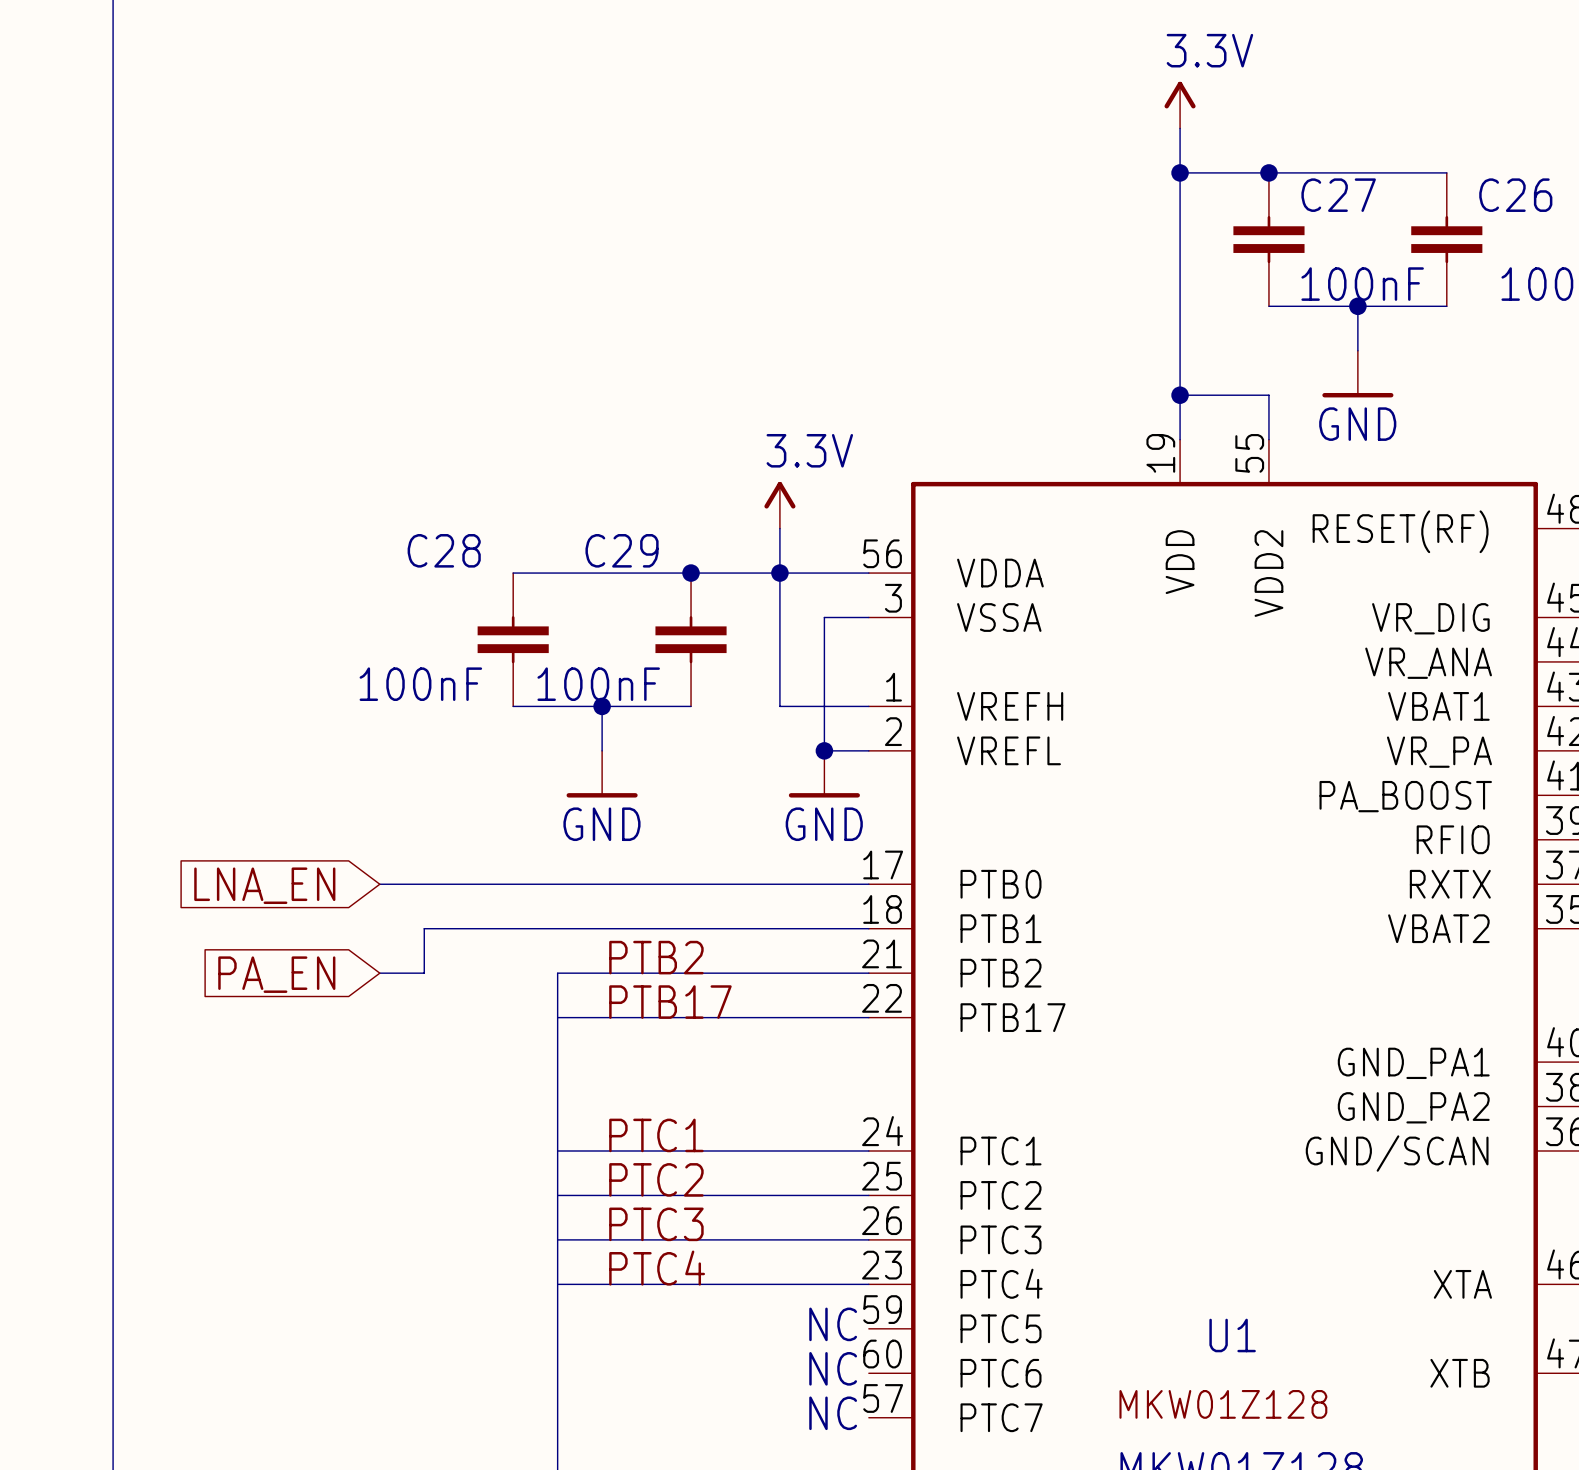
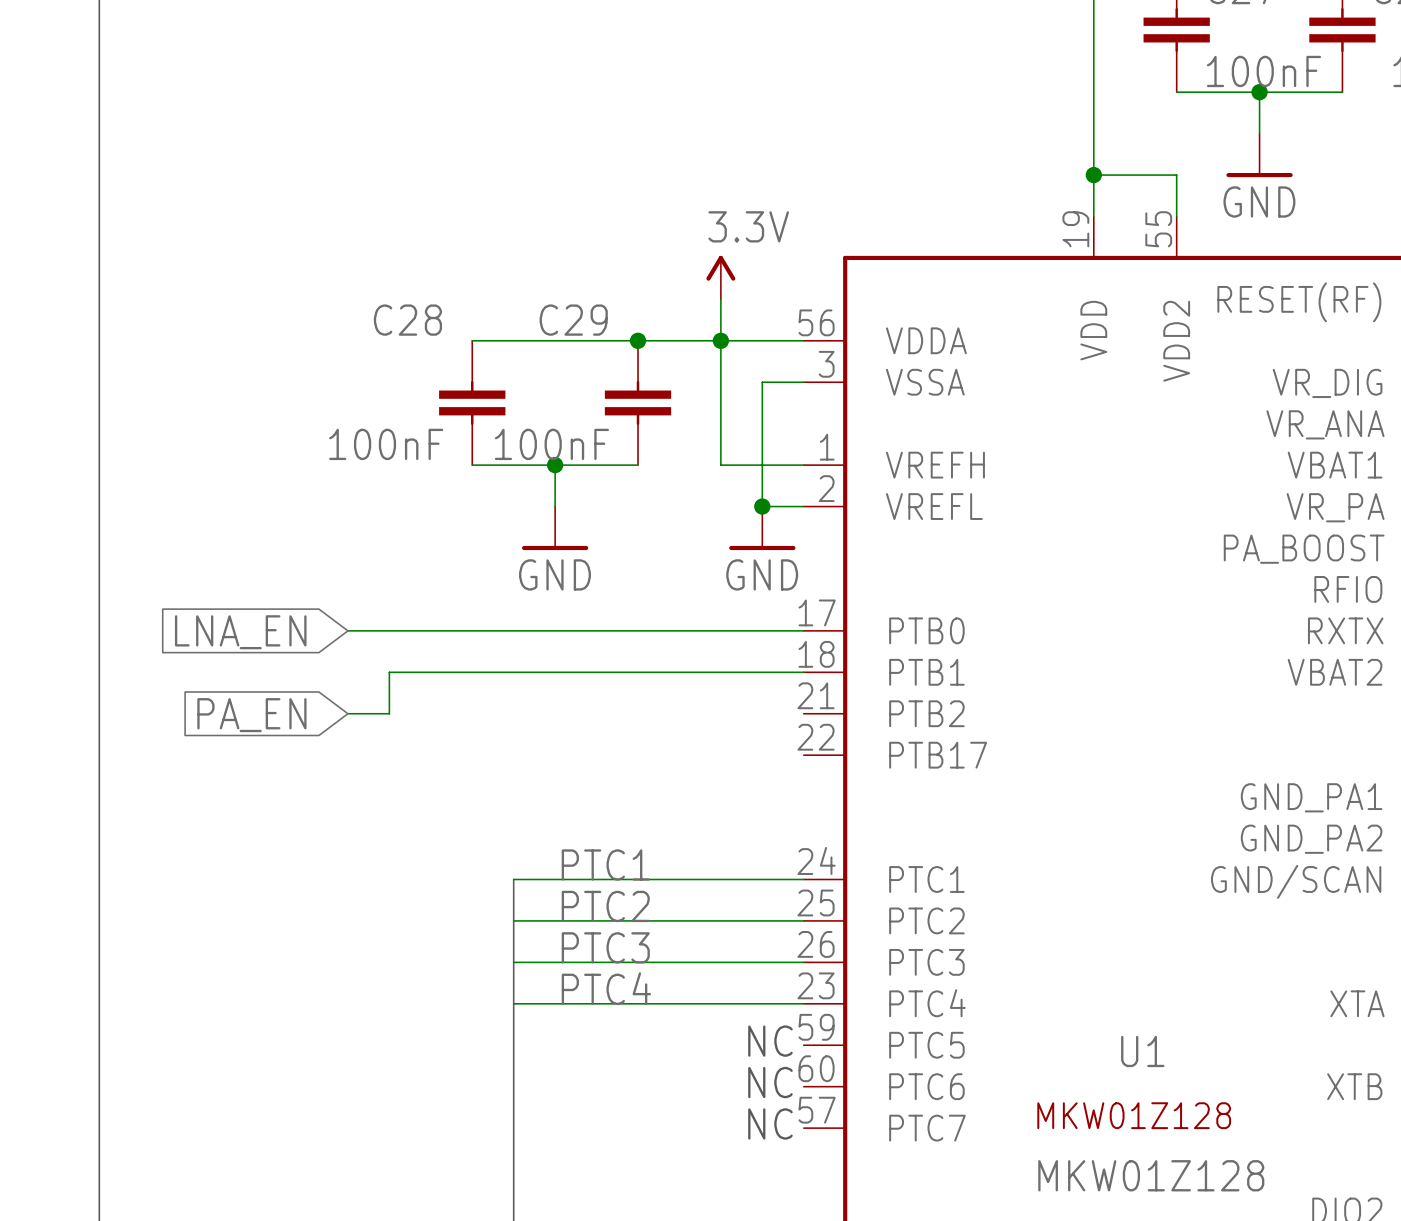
label: PTB2 (656, 957) -> none
bus: (557, 973) (557, 1150) -> none
wire: (557, 973) (868, 973) -> none
label: PTB17 (670, 1002) -> none
wire: (557, 1017) (868, 1017) -> none

